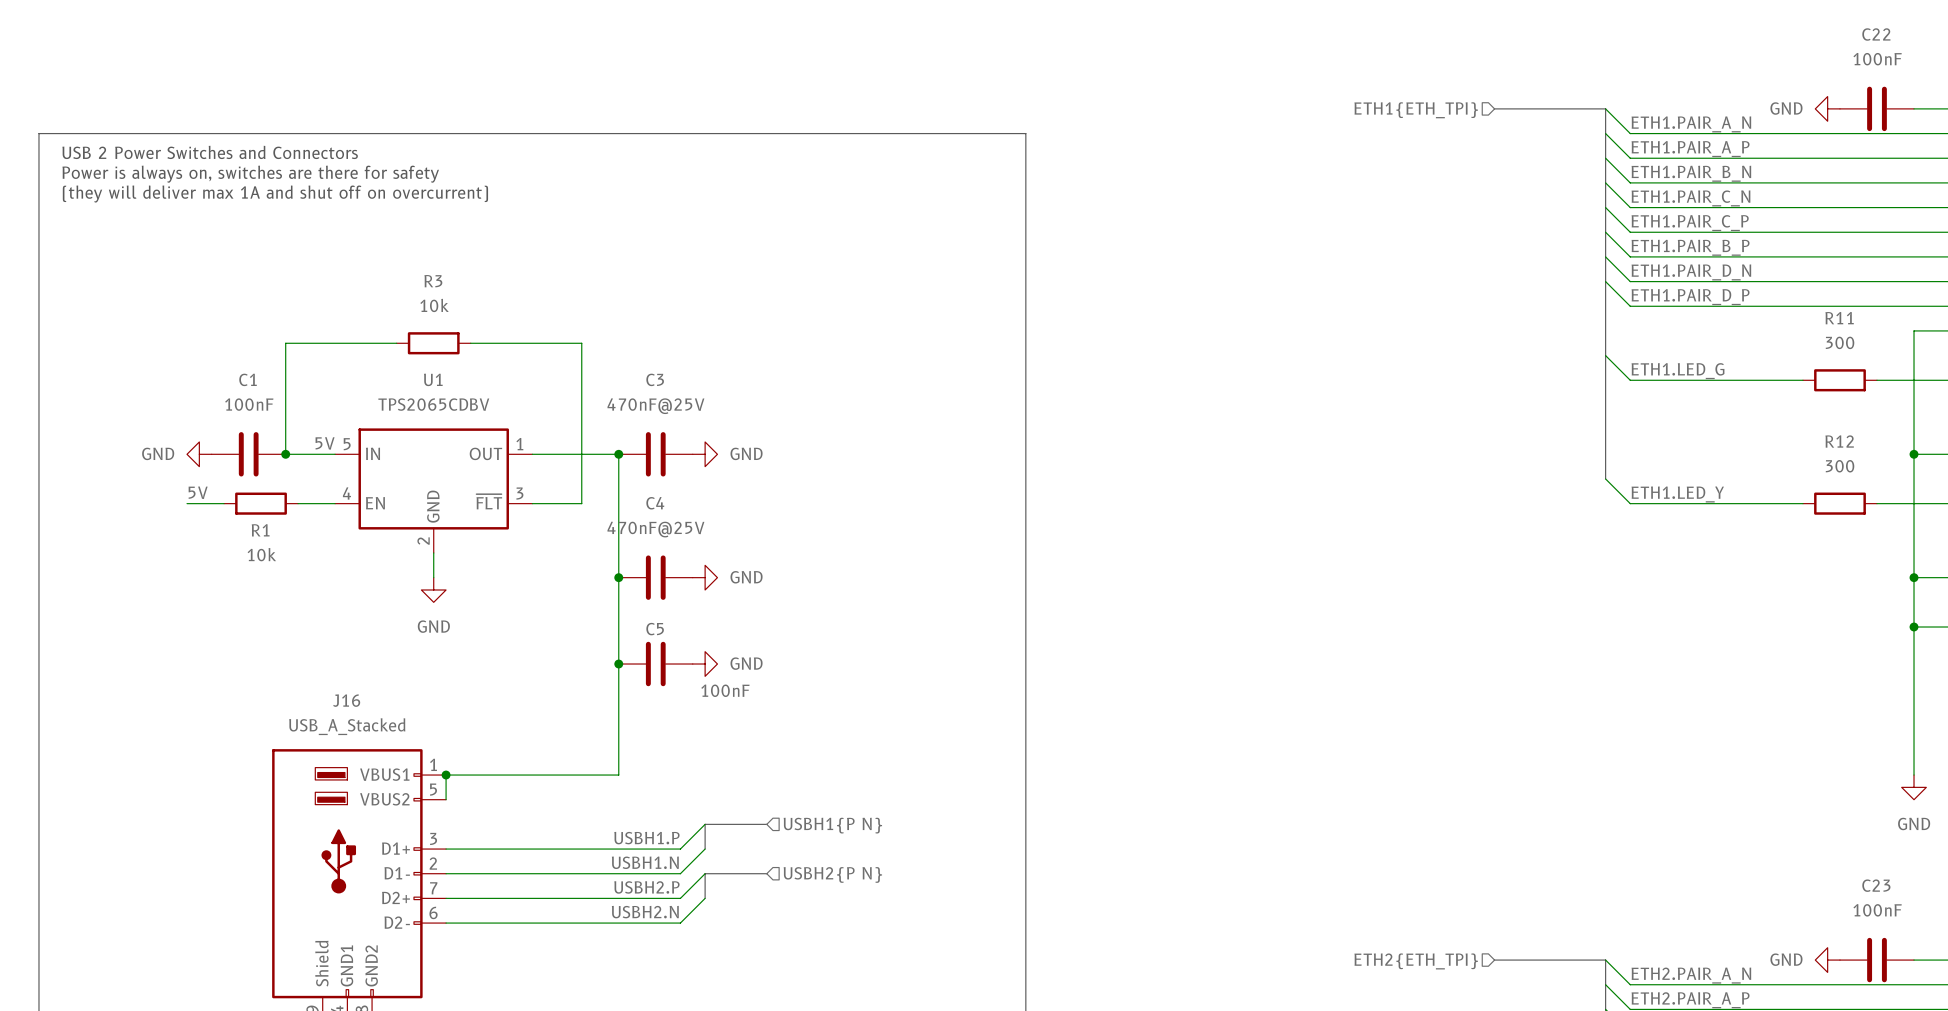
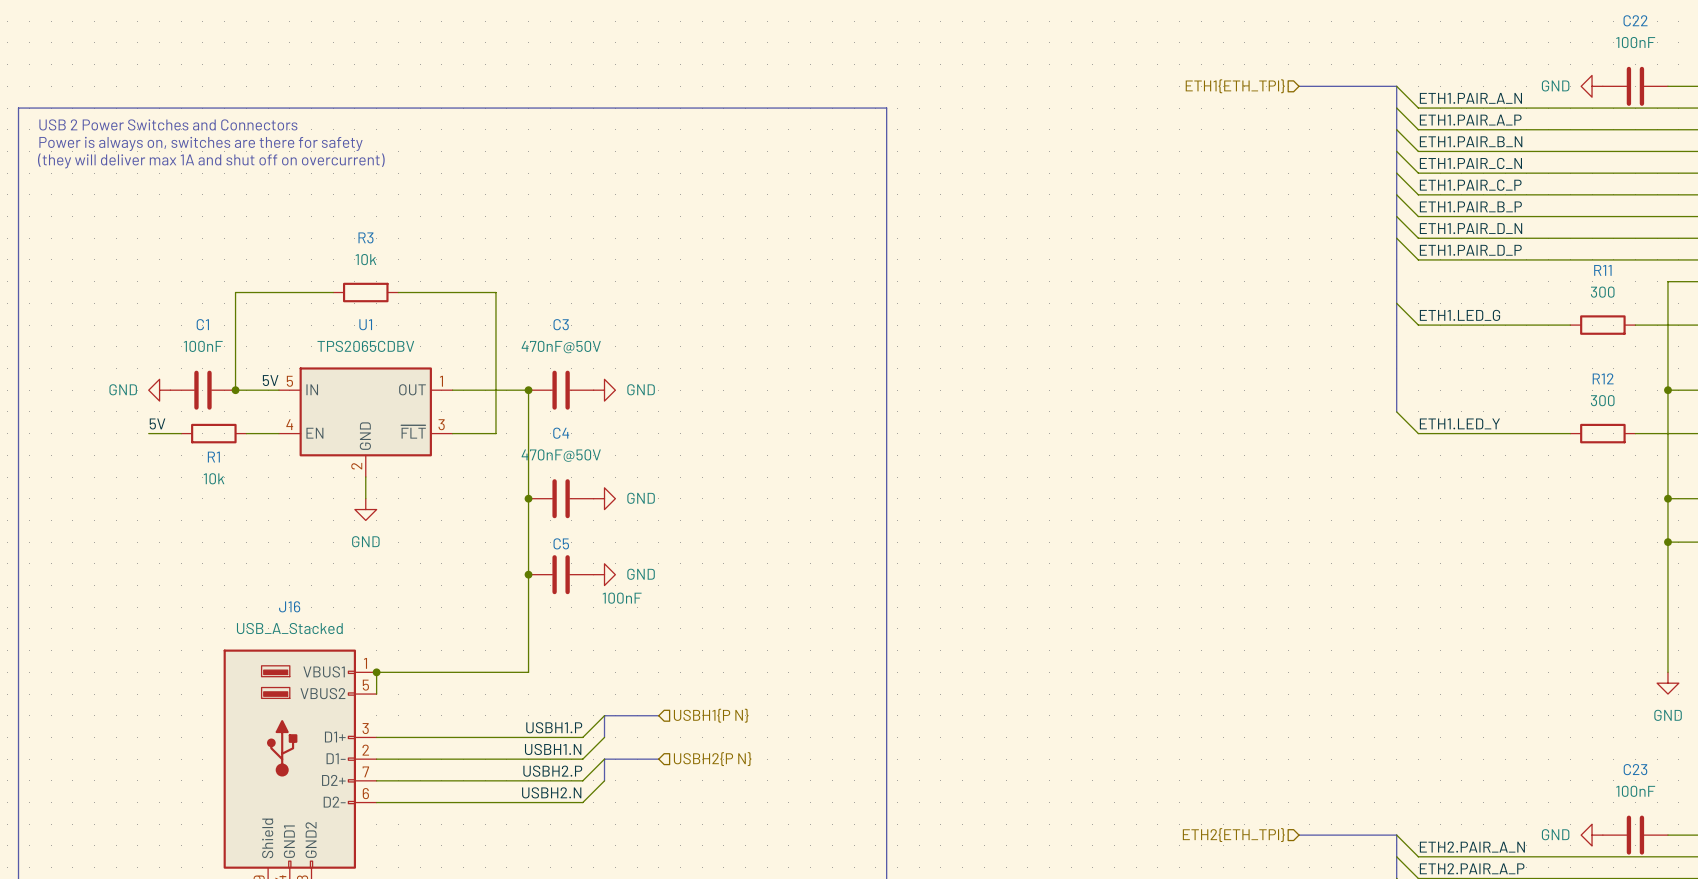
C3 value: 470nF@25V (655, 406) -> 470nF@50V (561, 347)
C4 value: 470nF@25V (655, 529) -> 470nF@50V (561, 455)

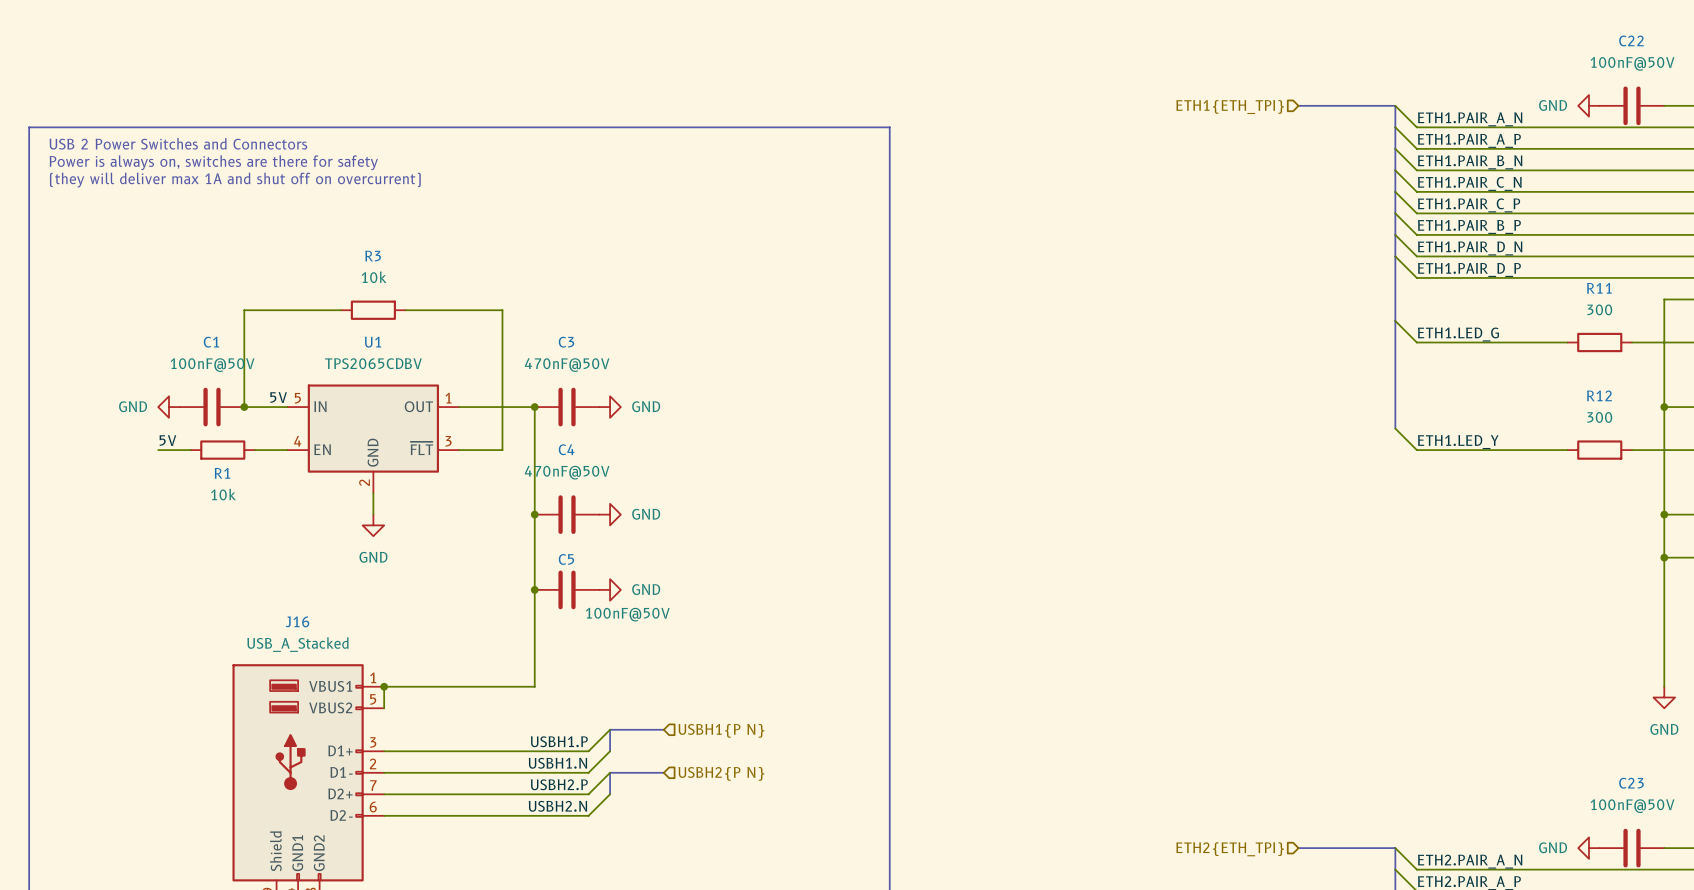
C22 value: 100nF (1635, 42) -> 100nF@50V (1632, 63)
C1 value: 100nF (203, 346) -> 100nF@50V (212, 365)
C5 value: 100nF (622, 598) -> 100nF@50V (627, 614)
C23 value: 100nF (1635, 791) -> 100nF@50V (1632, 806)

